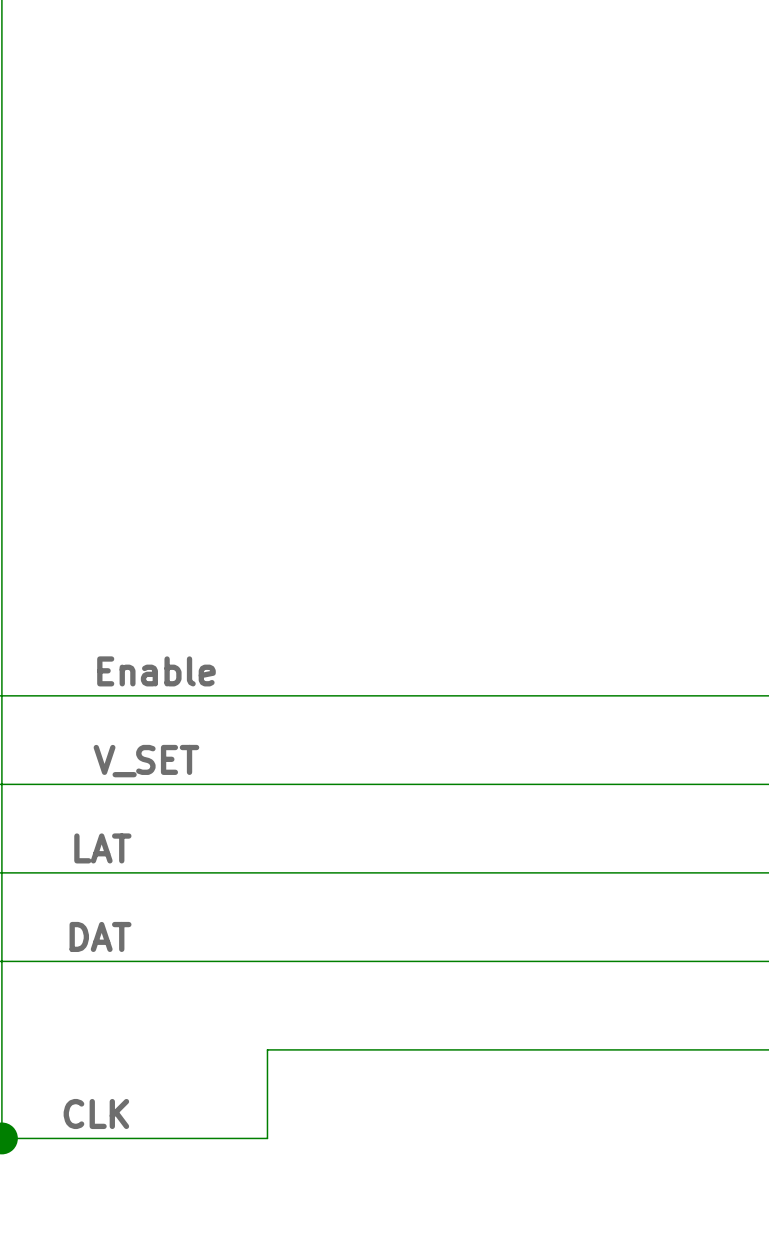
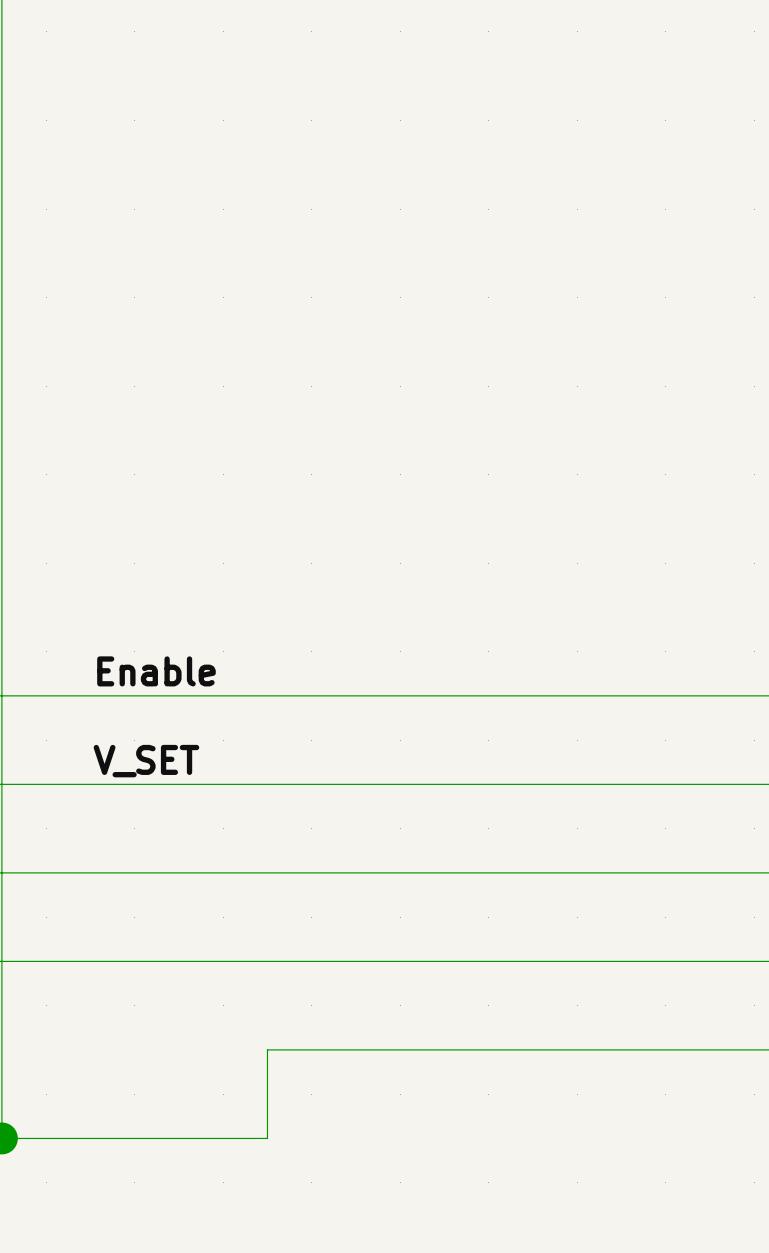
label: LAT (102, 848) -> none
label: DAT (100, 936) -> none
label: CLK (96, 1113) -> none

